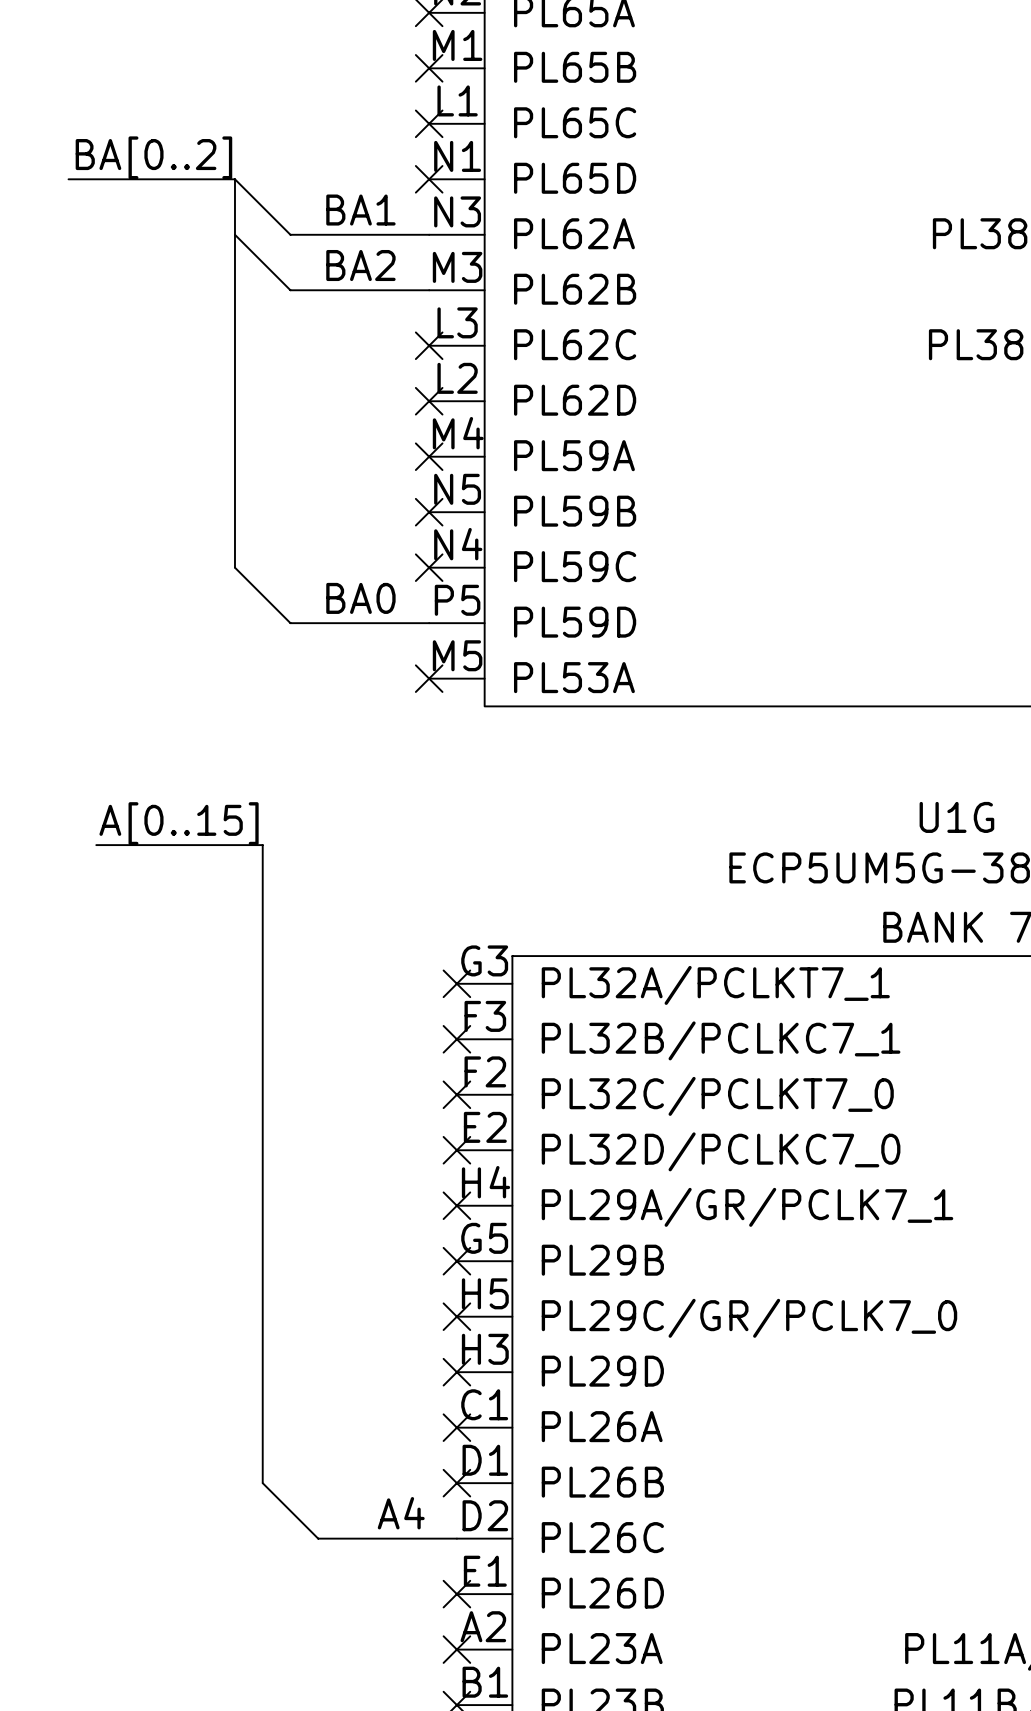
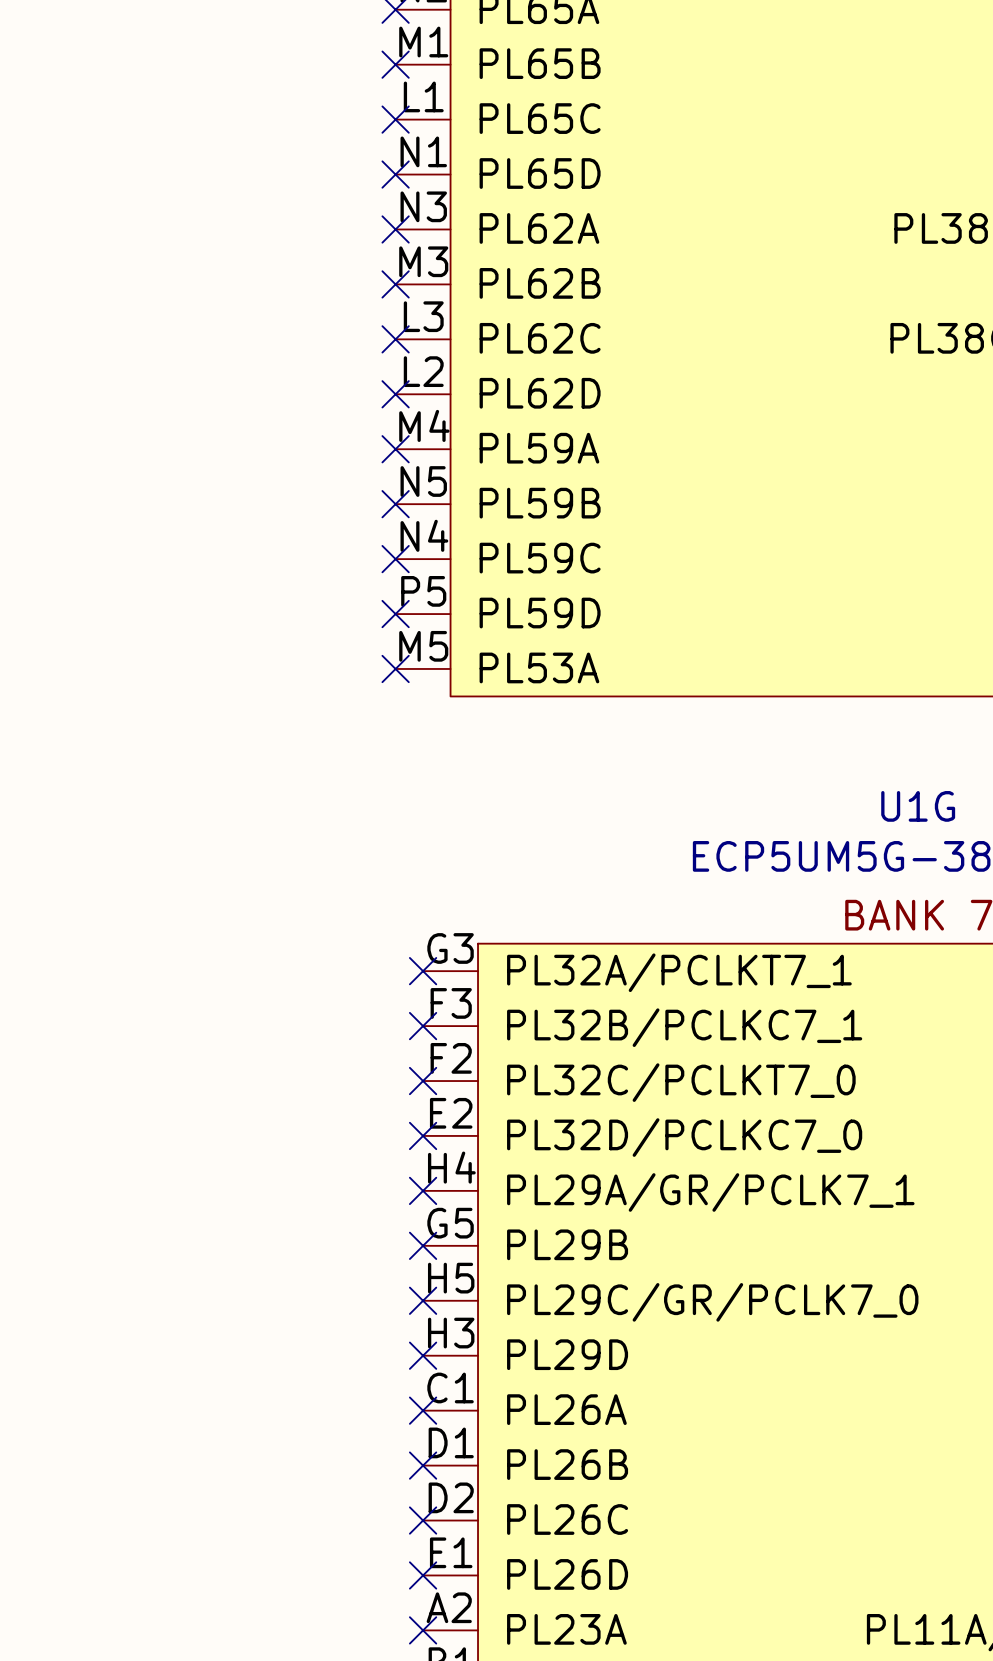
label: BA[0..2] (153, 157) -> none
bus: (68, 179) (234, 179) (234, 567) -> none
wire: (234, 179) (290, 234) (429, 234) -> none
label: BA1 (360, 210) -> none
wire: (234, 234) (290, 290) (429, 290) -> none
no-connect mark: none -> (395, 229)
label: BA2 (360, 265) -> none
no-connect mark: none -> (395, 284)
wire: (234, 567) (290, 623) (429, 623) -> none
label: BA0 (360, 598) -> none
no-connect mark: none -> (395, 614)
label: A[0..15] (179, 823) -> none
bus: (96, 845) (262, 845) (262, 1483) -> none
wire: (262, 1483) (318, 1538) (456, 1538) -> none
label: A4 (401, 1513) -> none
no-connect mark: none -> (423, 1520)

